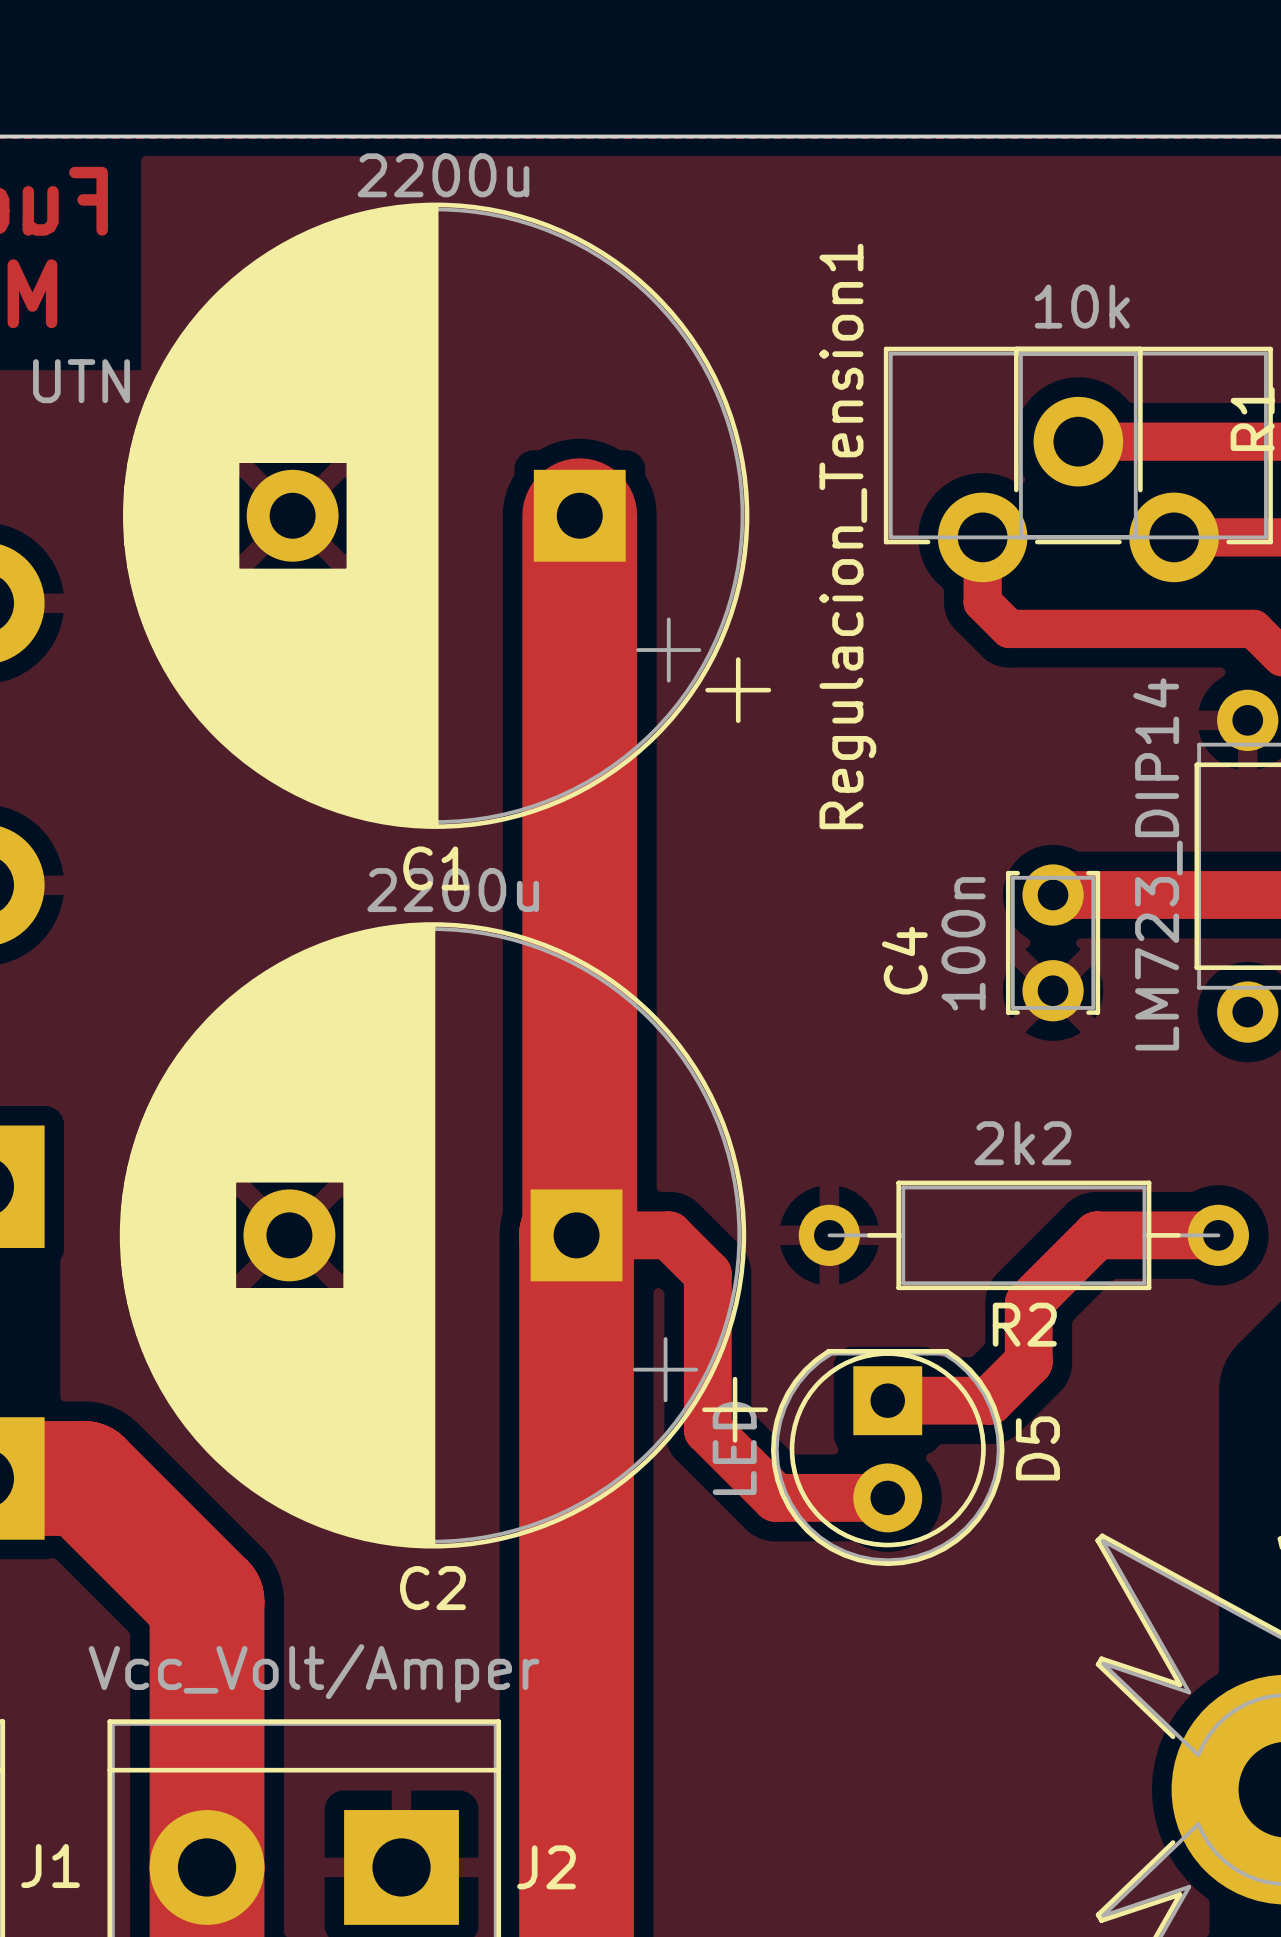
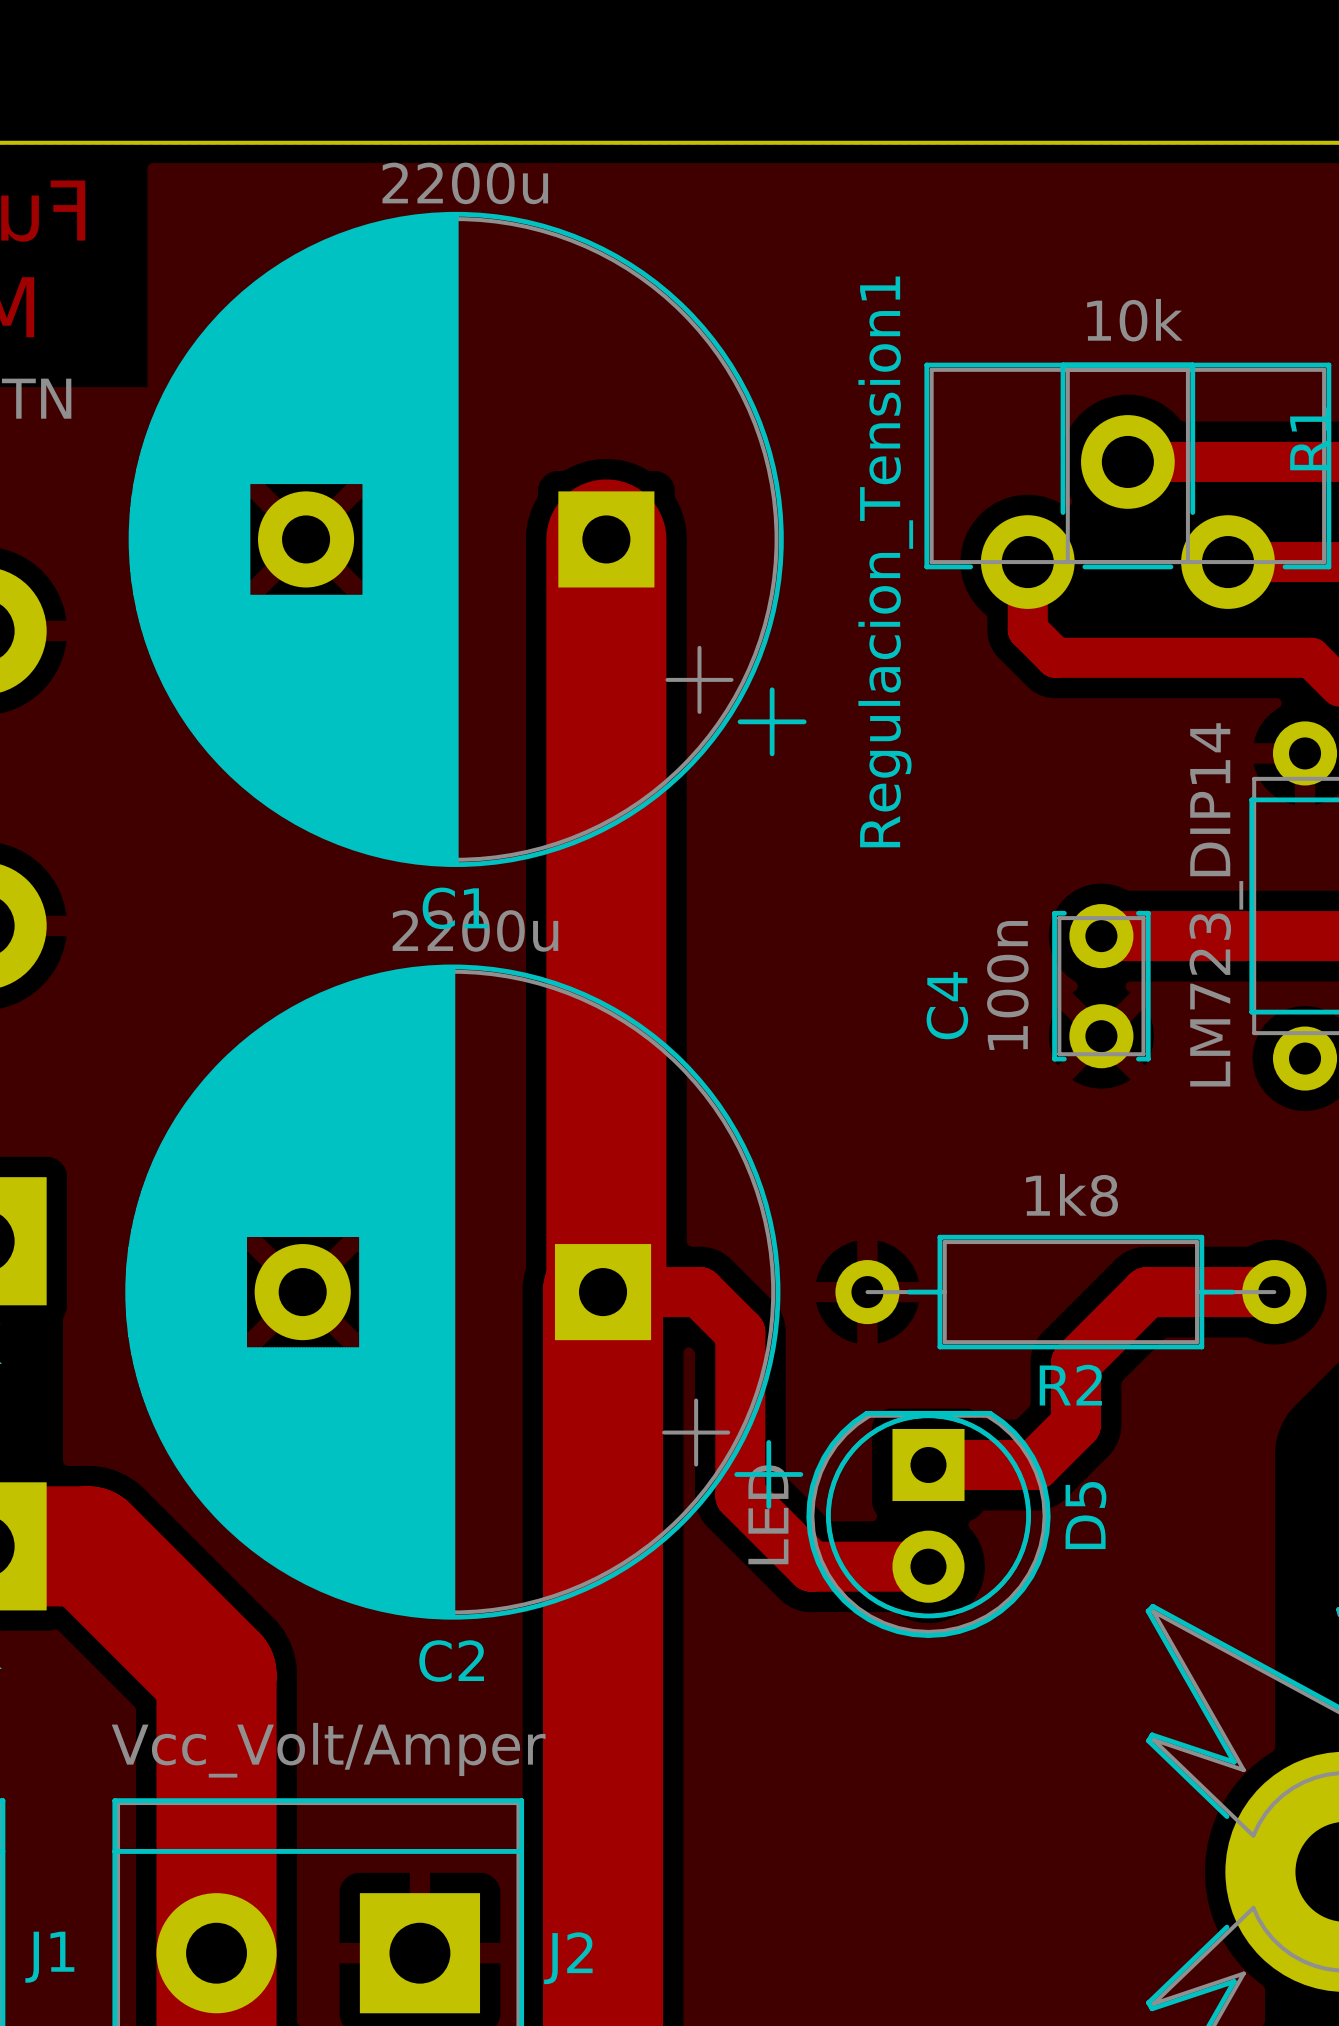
R2 value: 2k2 (1022, 1143) -> 1k8 (1072, 1195)

